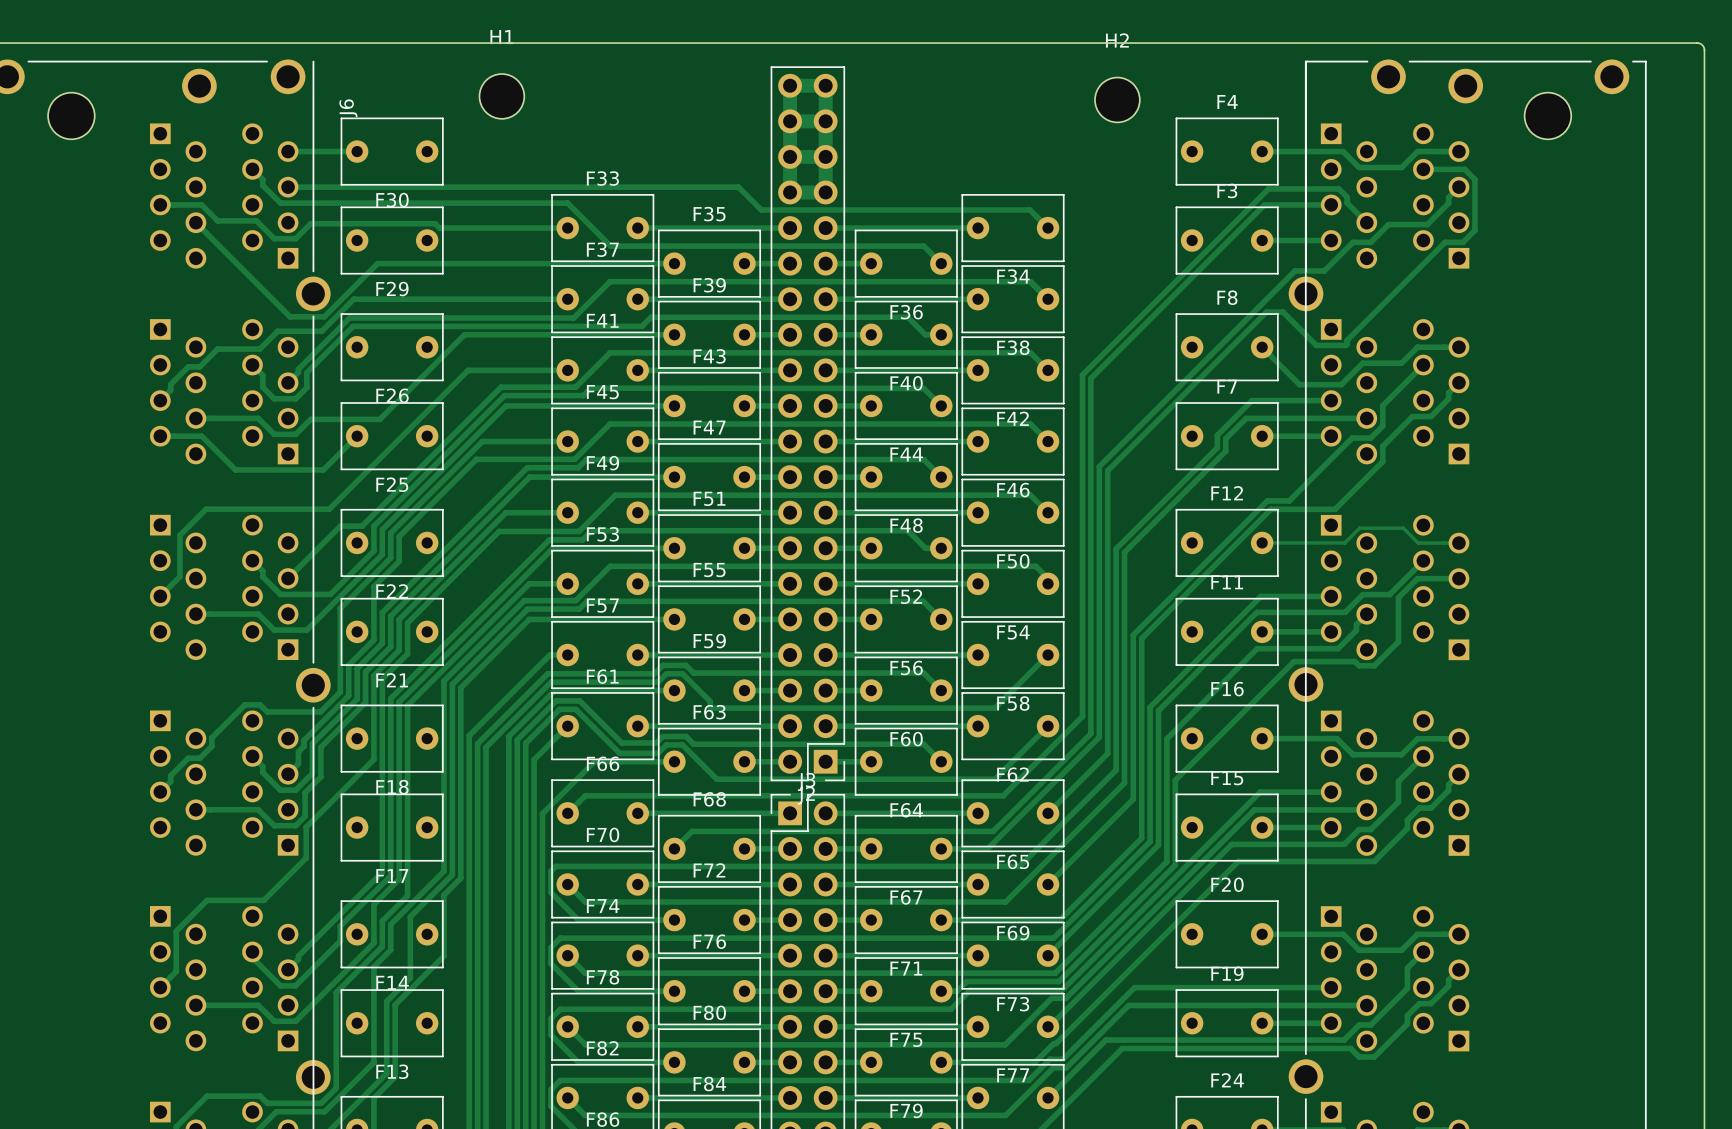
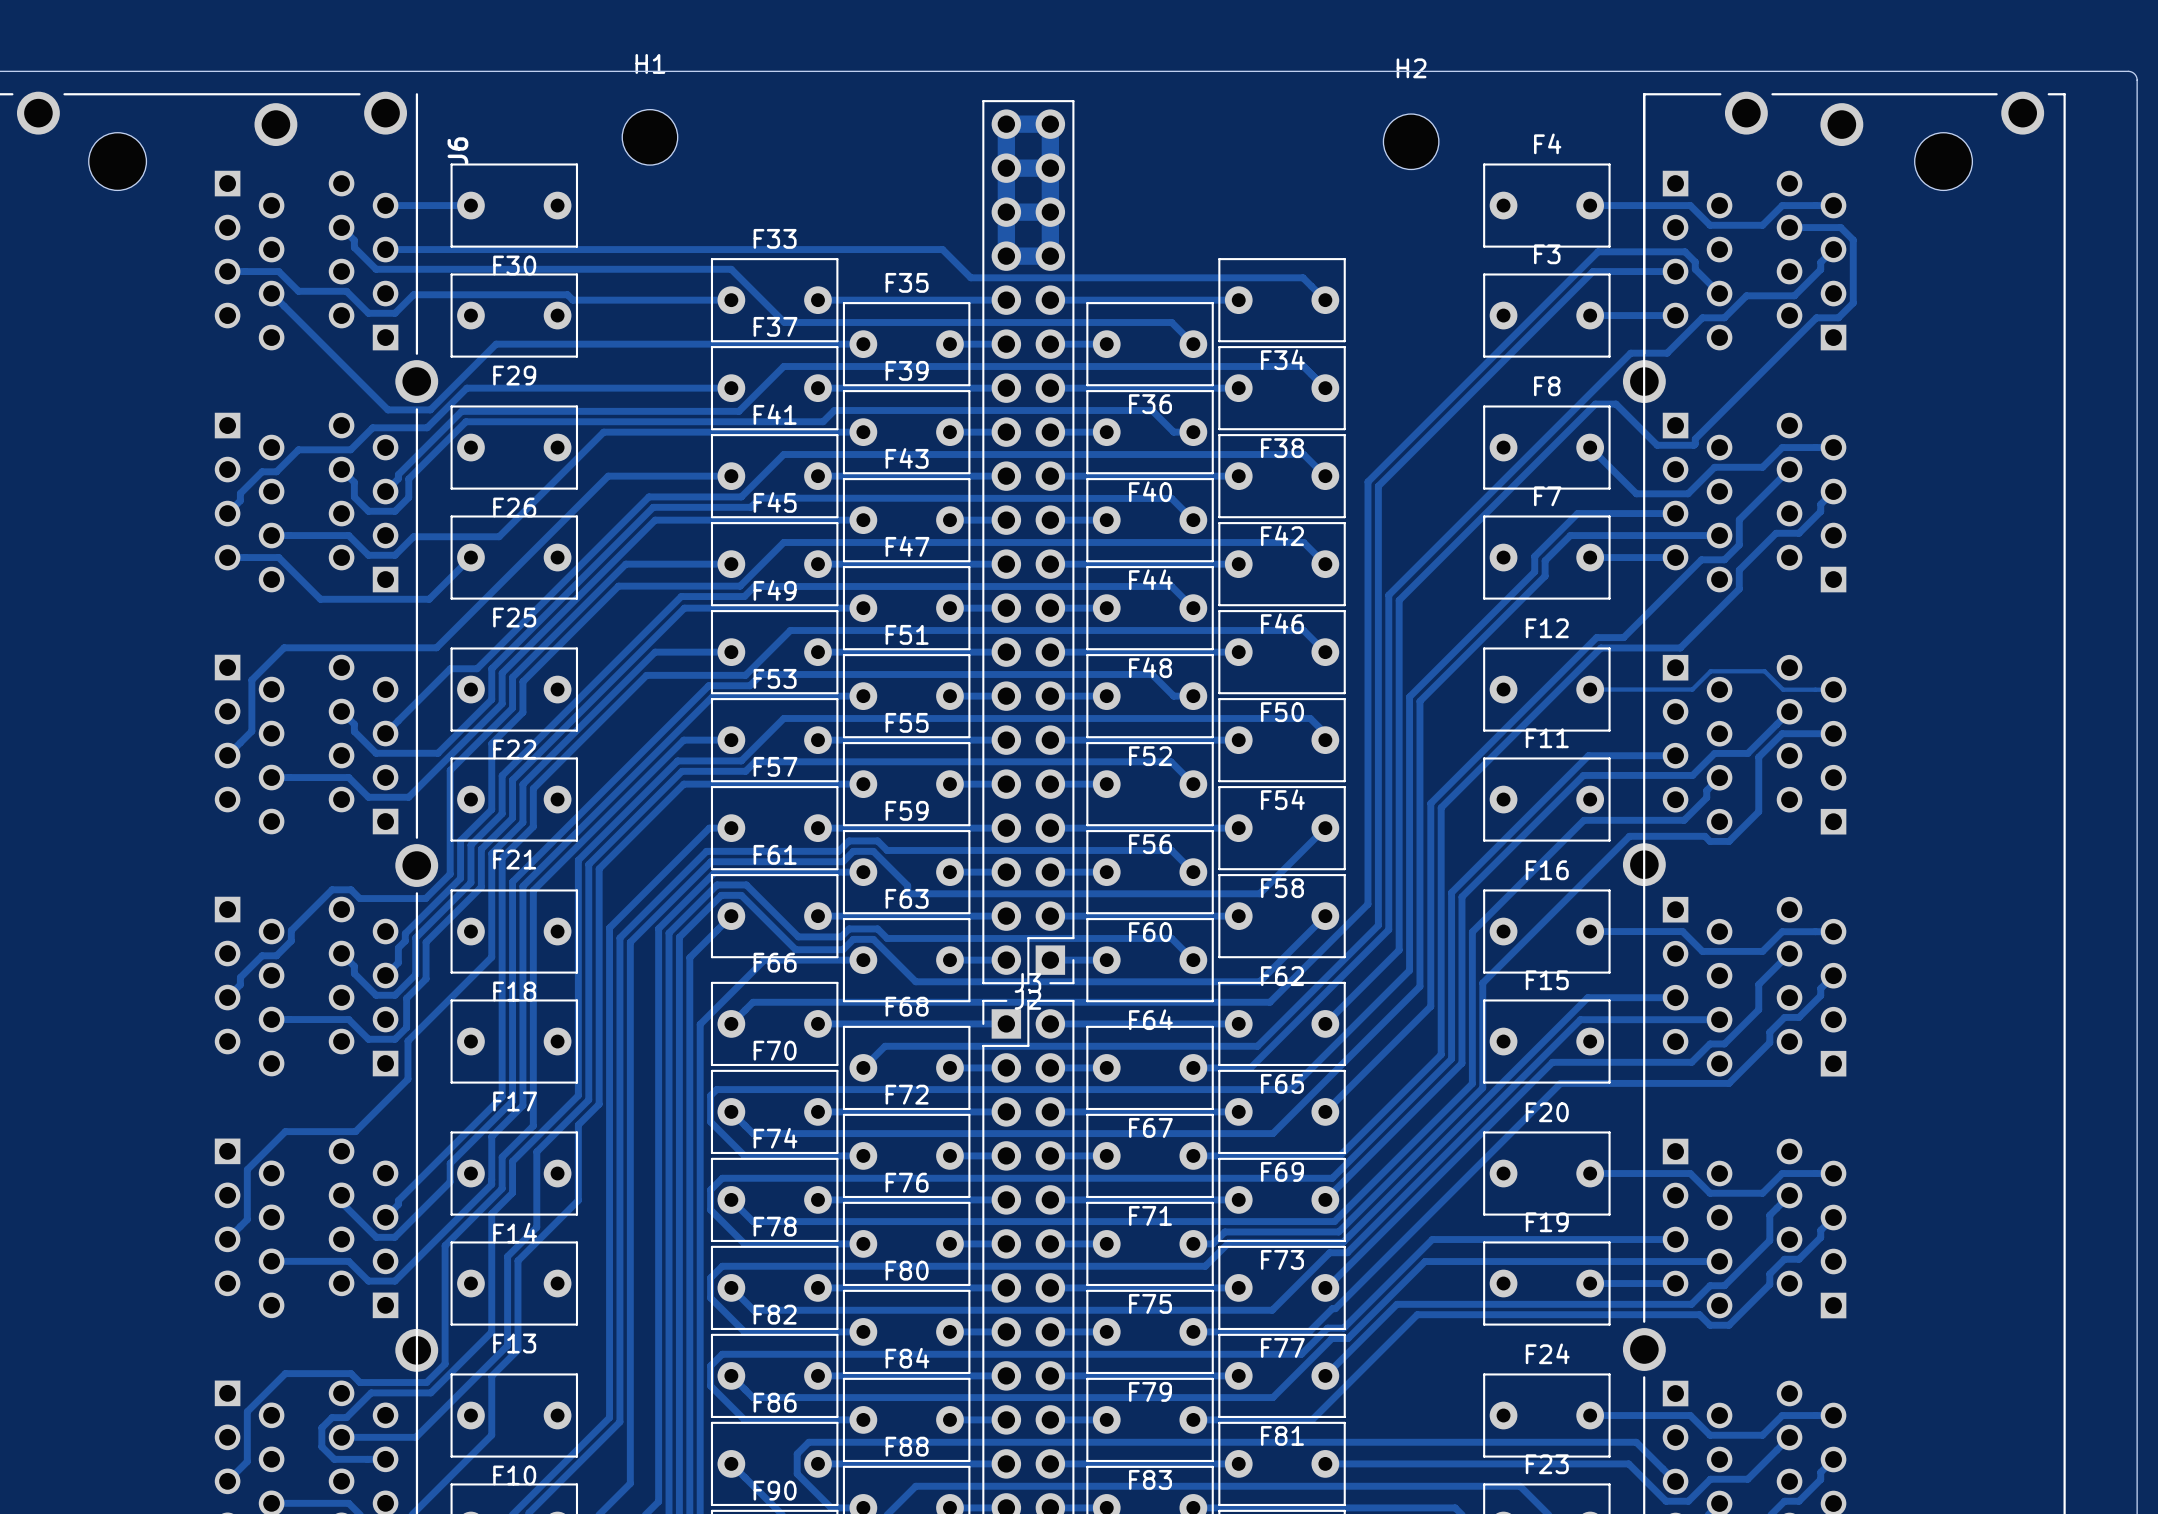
track: (1262, 631) (1331, 631) -> none
track: (1262, 827) (1331, 827) -> none

